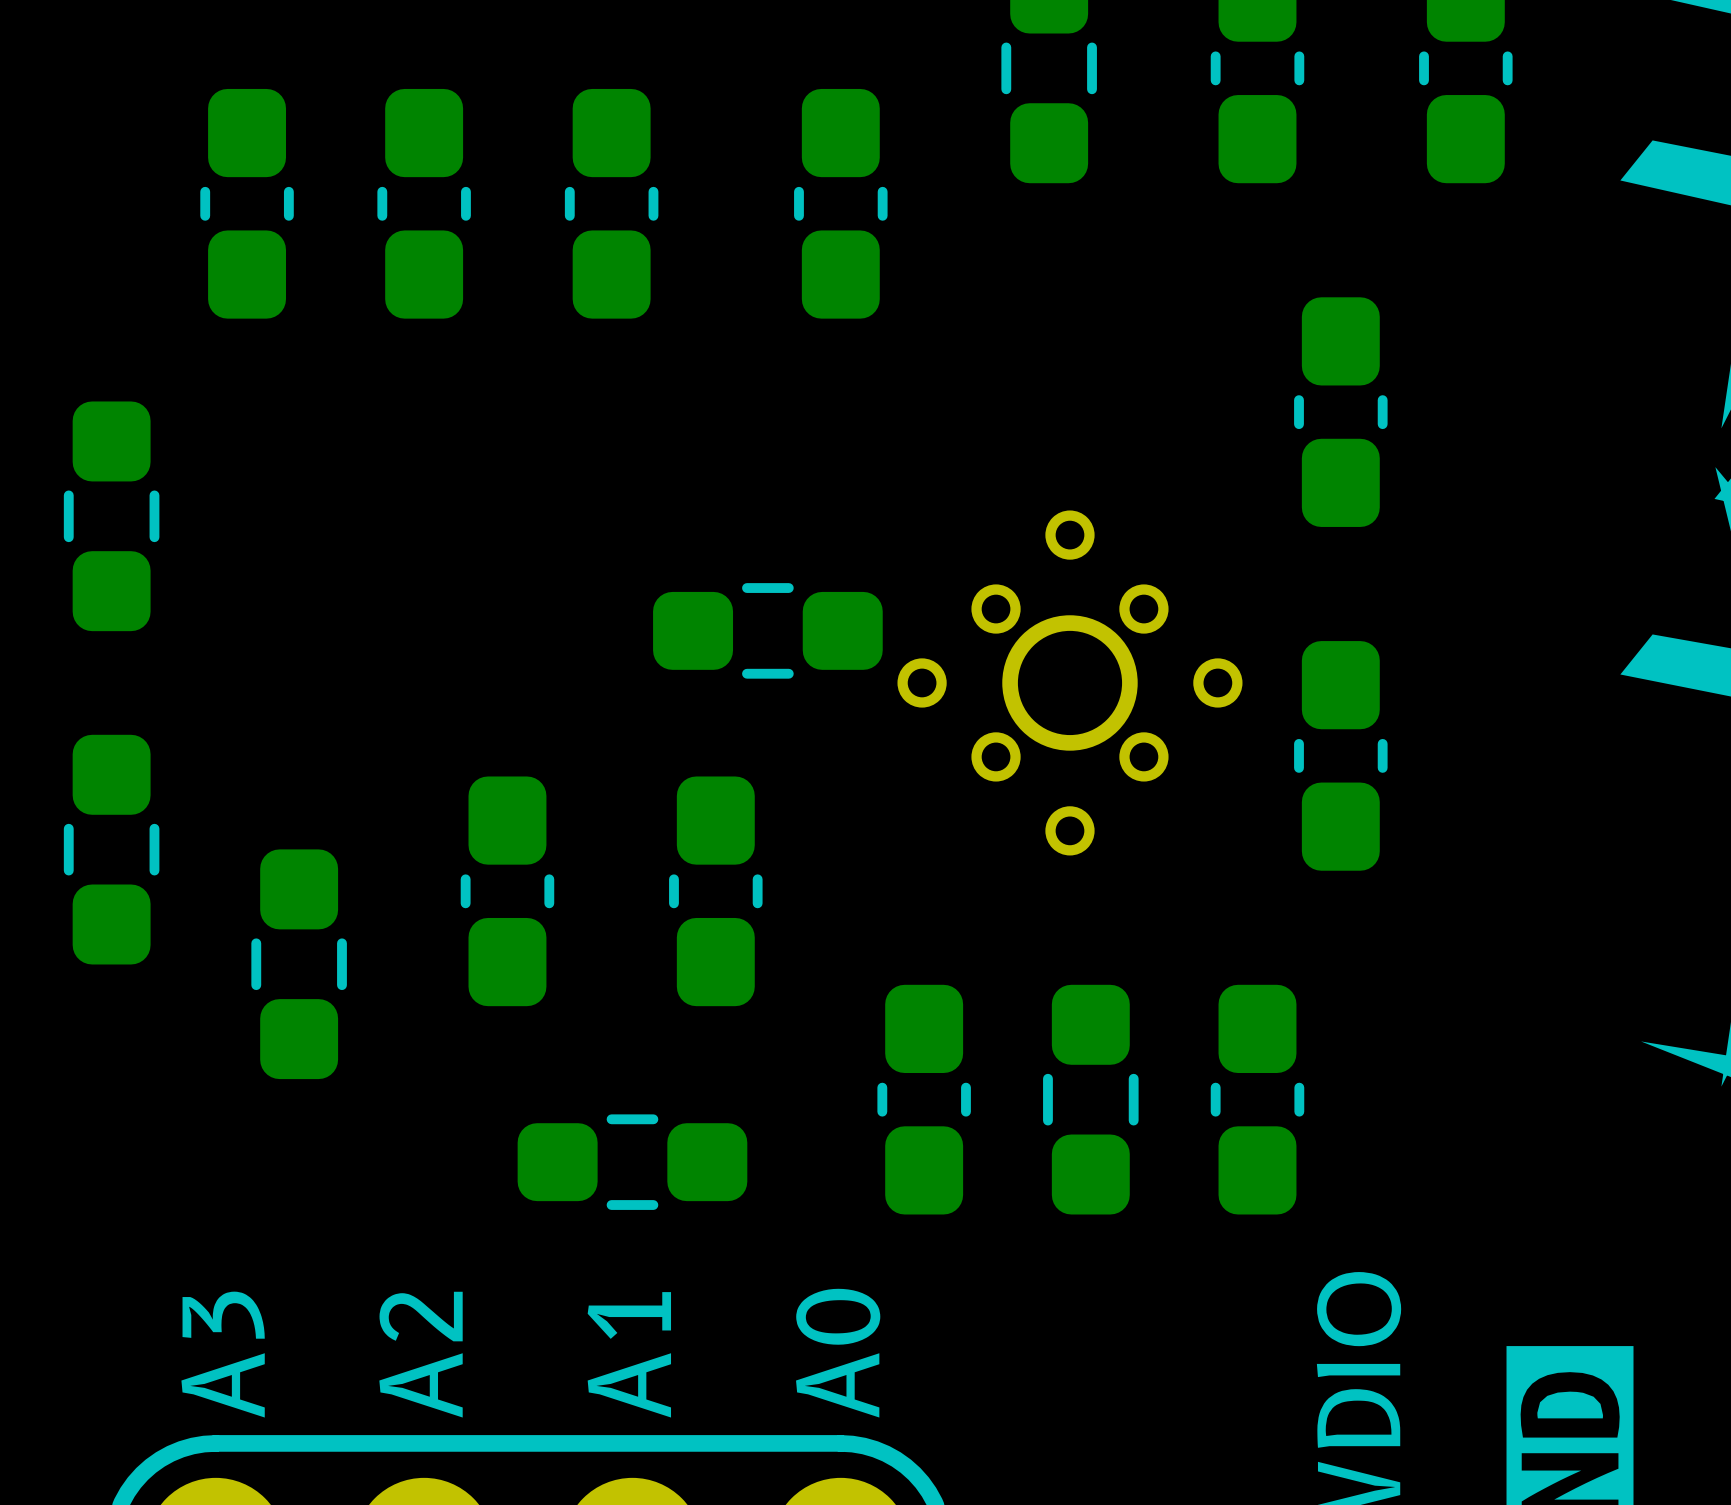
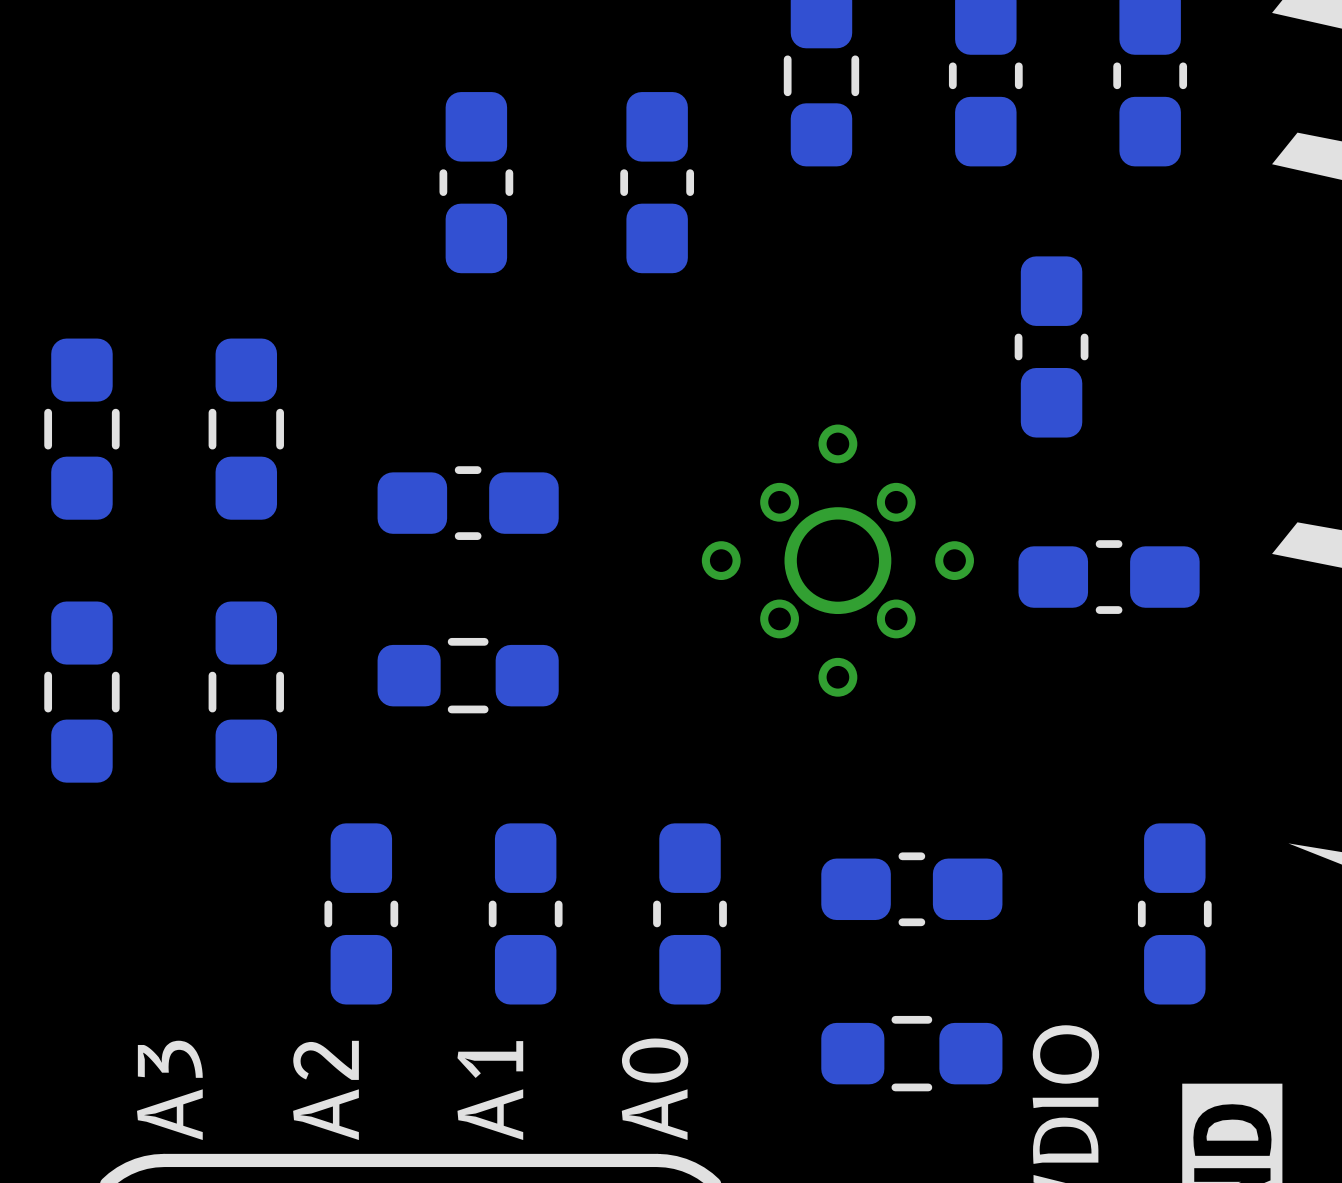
part: (247, 203) -> none
part: (424, 203) -> none
part: none -> (246, 429)
part: none -> (468, 503)
part: (767, 630) -> none
part rotation: 0° (1340, 755) -> 90° clockwise (1109, 577)
part: none -> (468, 675)
part: (507, 891) -> none
part: (715, 891) -> none
part position: (299, 964) -> (246, 692)
part position: (924, 1099) -> (690, 913)
part rotation: 0° (1090, 1099) -> 90° clockwise (911, 1053)
part position: (1090, 1099) -> (911, 1053)
part rotation: 0° (1257, 1099) -> 90° clockwise (911, 889)
part footprint: [517, 1114, 748, 1210] -> [488, 823, 563, 1005]
part: none -> (361, 913)
part: none -> (1174, 913)

